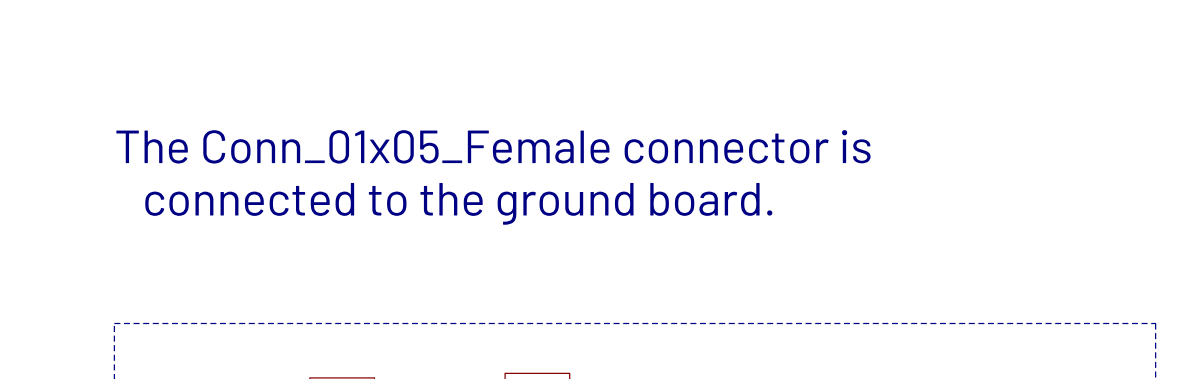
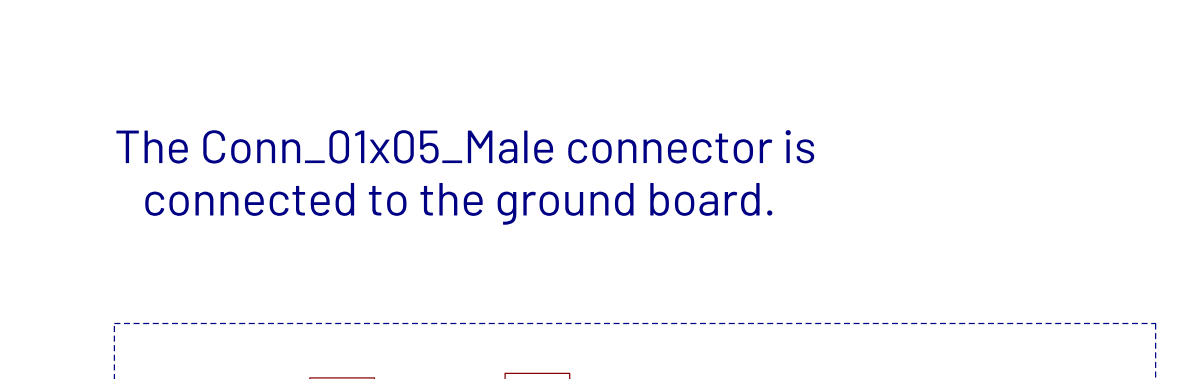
text: The Conn_01x05_Female connector is (493, 146) -> The Conn_01x05_Male connector is (465, 146)

